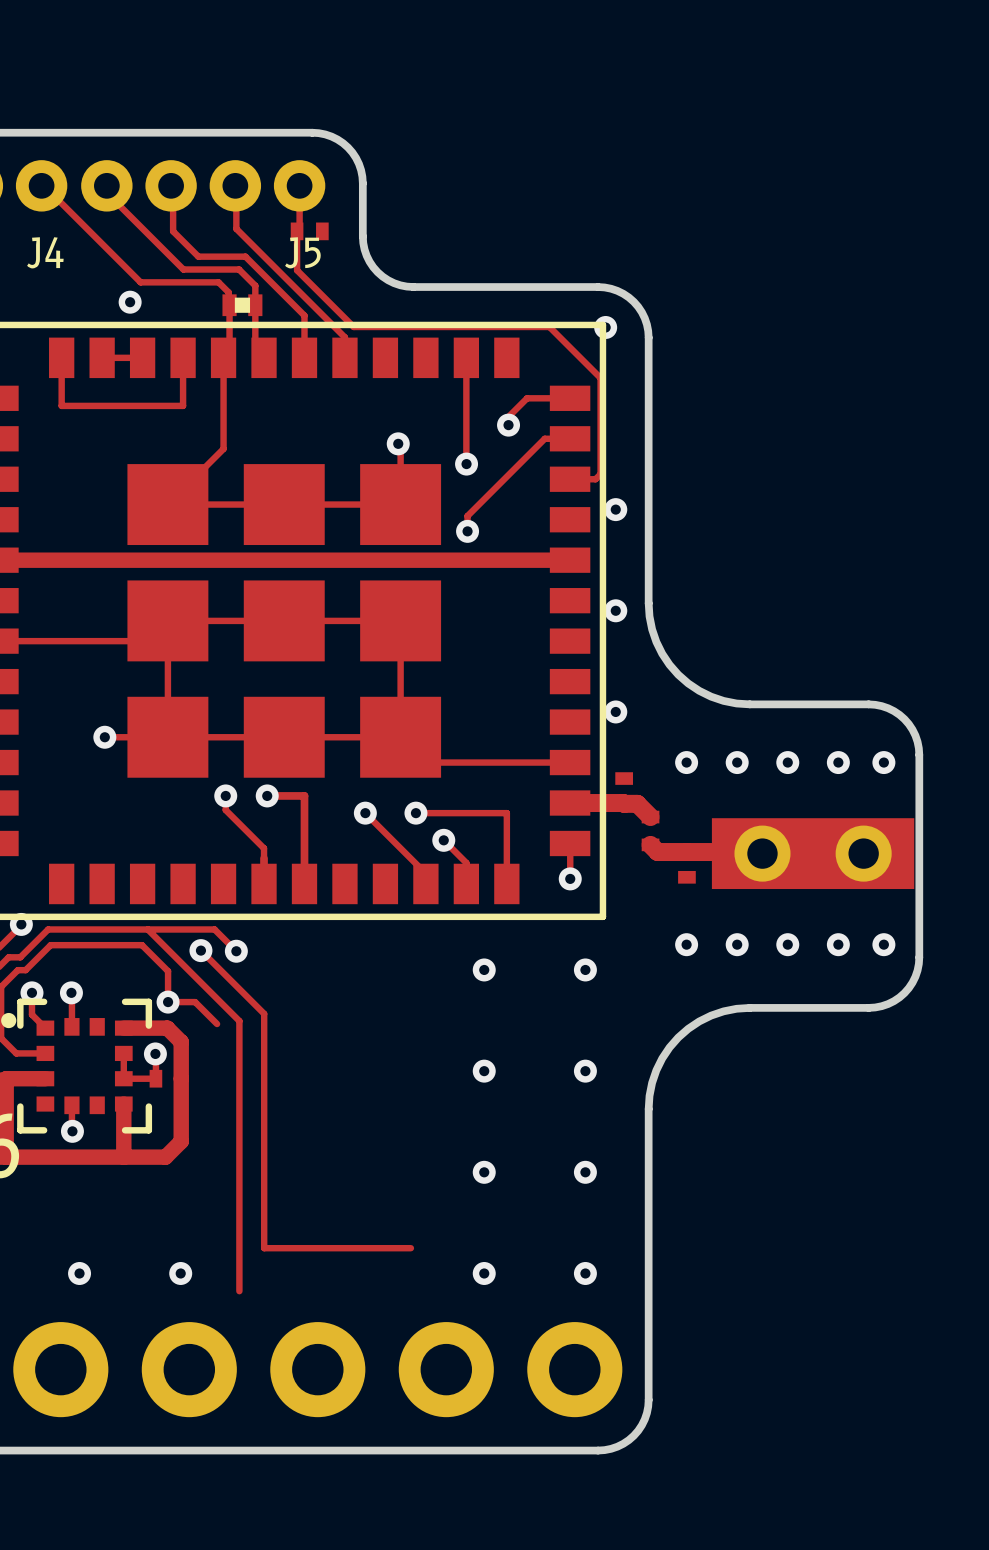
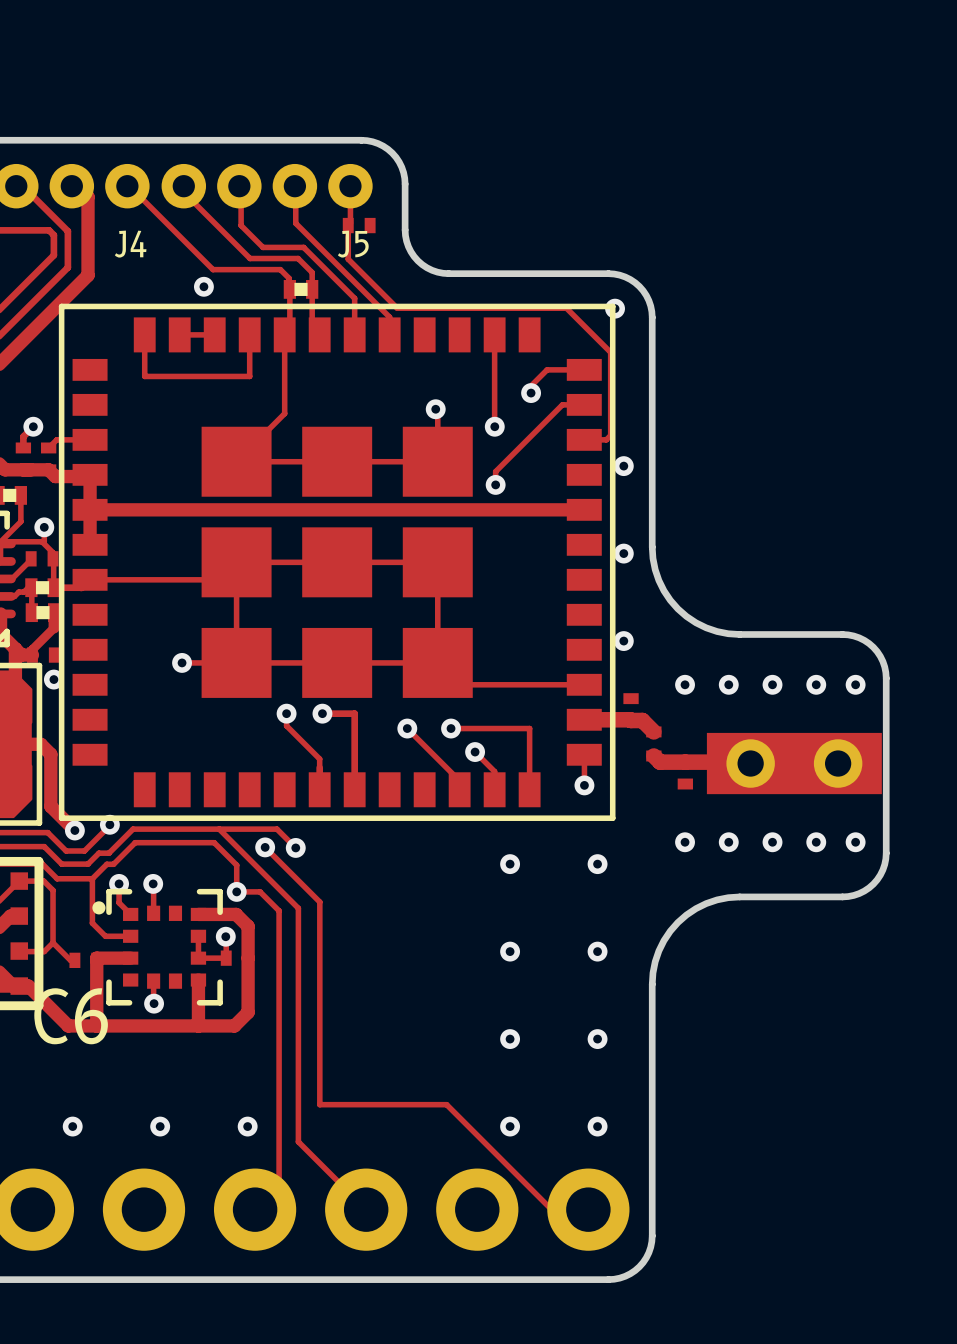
track: none -> (279, 910) (279, 1185) (255, 1209)
track: none -> (446, 1104) (551, 1209) (588, 1209)
track: none -> (298, 1141) (366, 1209)

